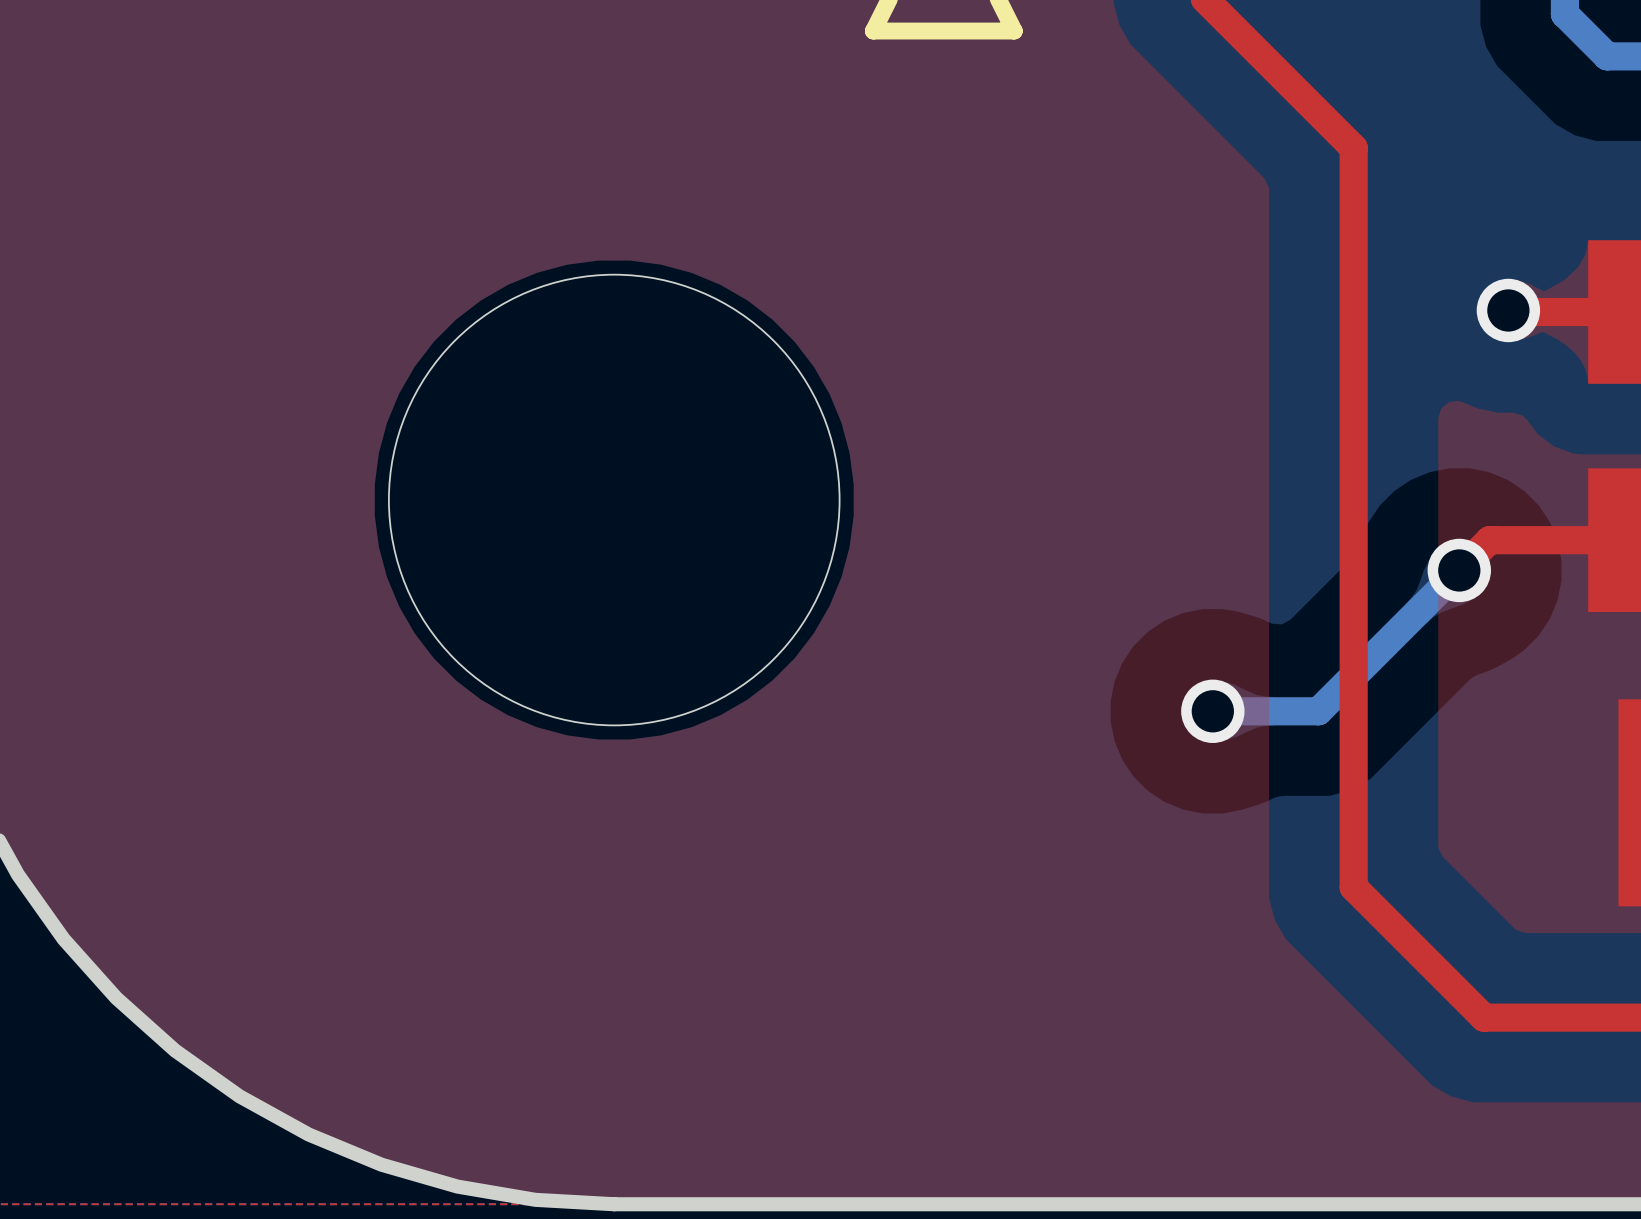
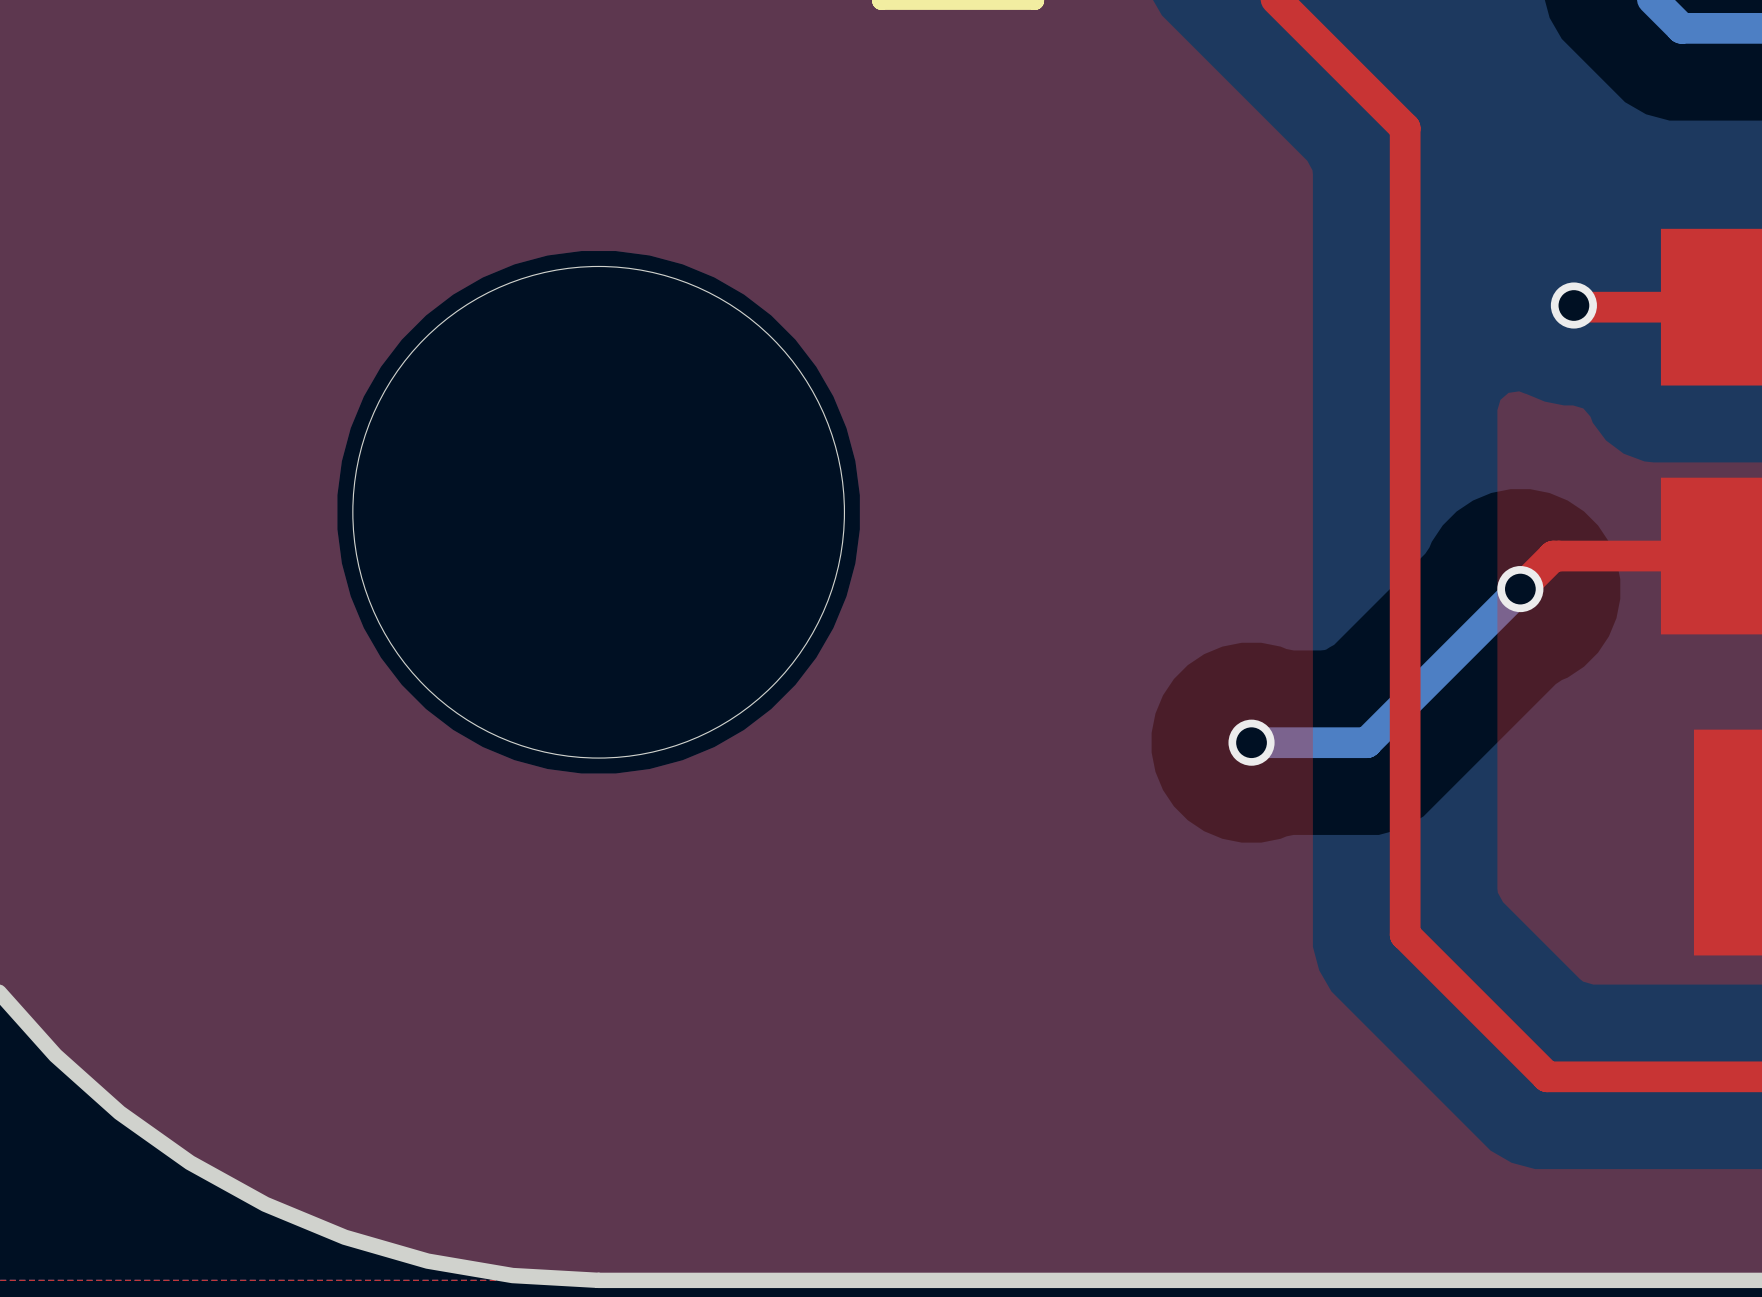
via size: [1476, 278, 1541, 343] -> [1550, 282, 1597, 329]
via size: [1427, 538, 1491, 603] -> [1497, 566, 1544, 613]
via size: [1181, 679, 1245, 743] -> [1228, 719, 1275, 766]

